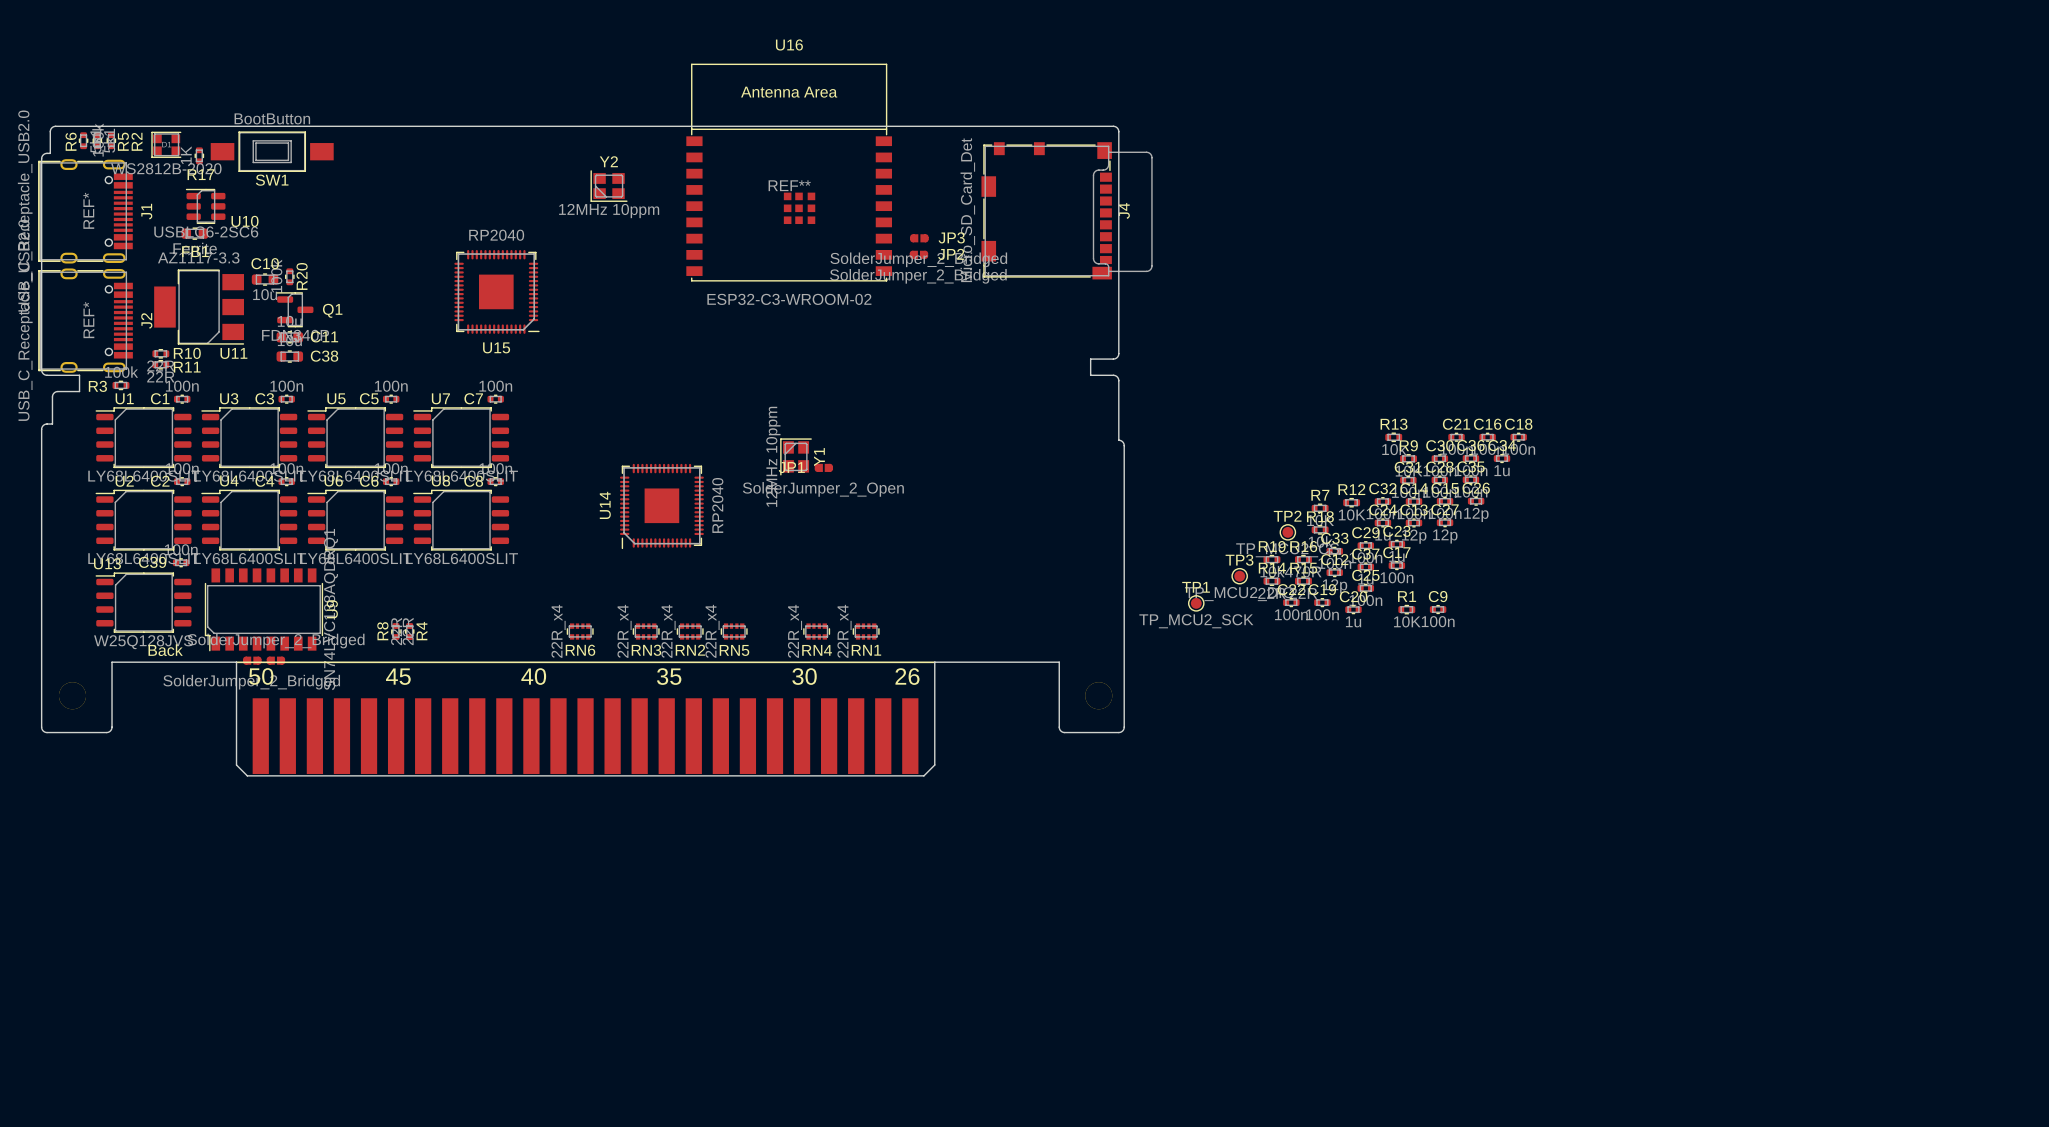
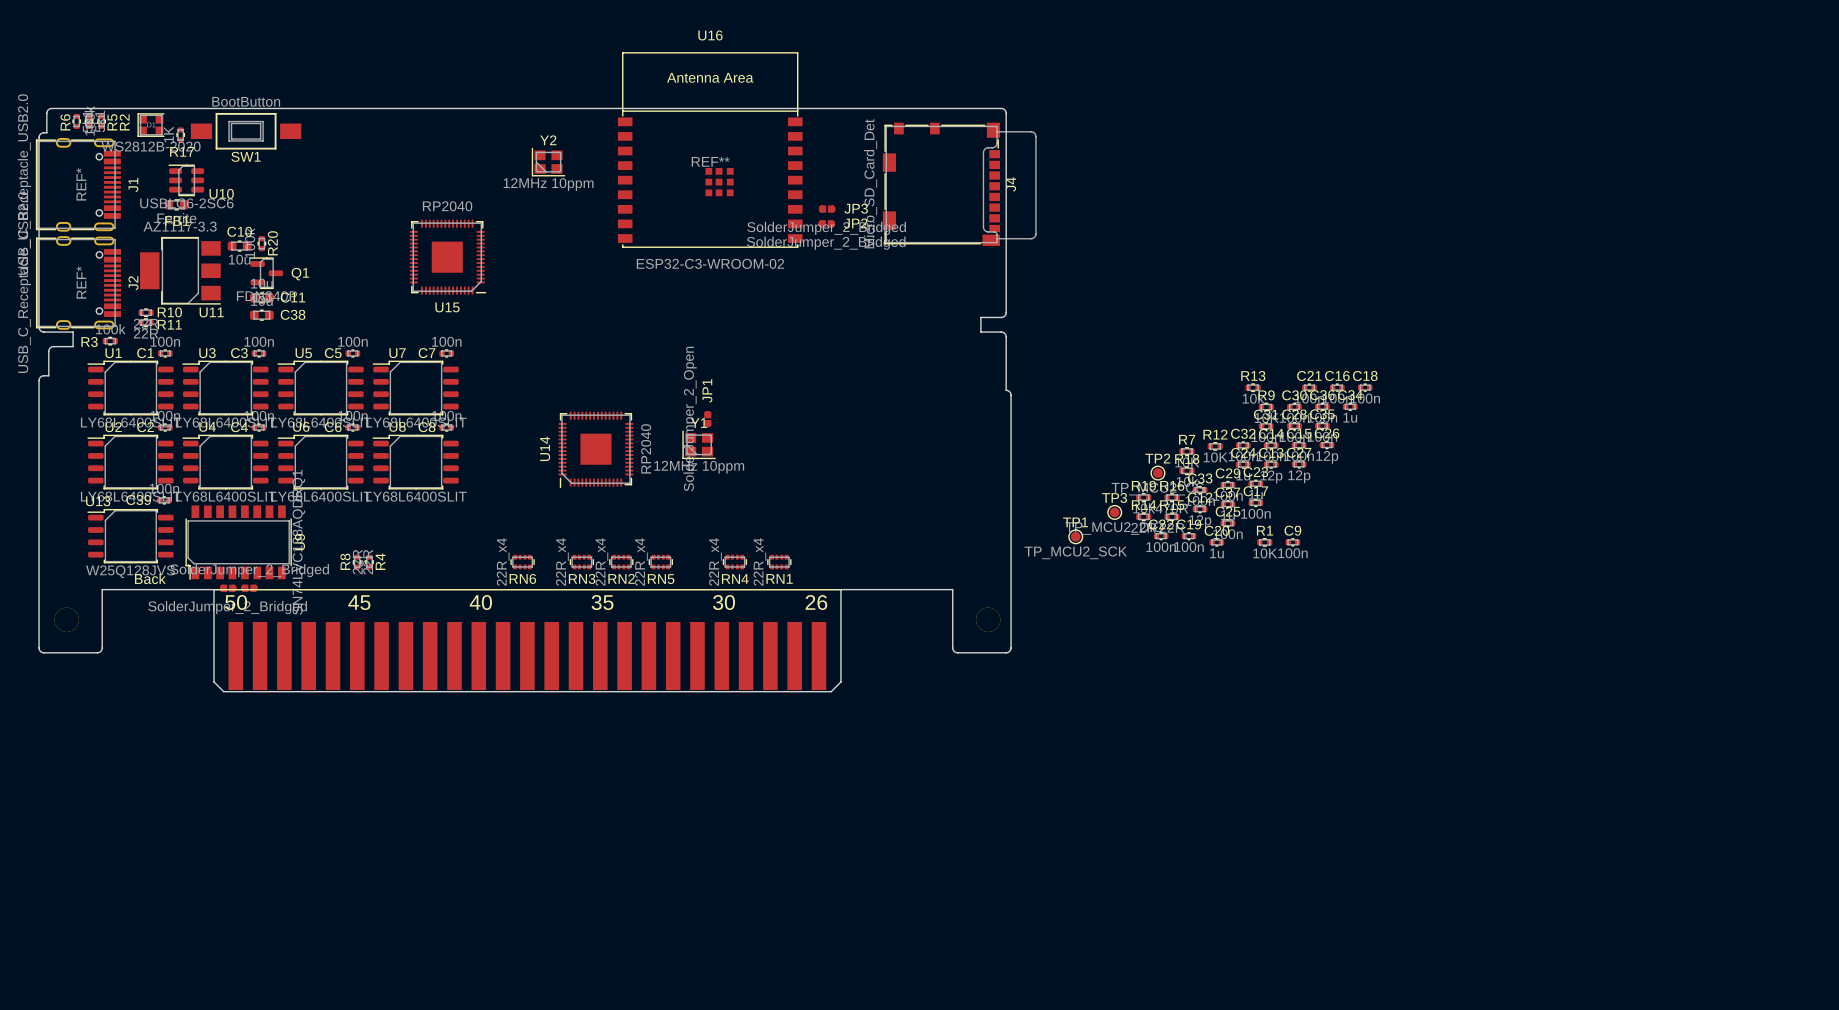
Y1 rotation: 0° (796, 456) -> 90° counterclockwise (699, 444)
Y1 position: (796, 456) -> (699, 444)
JP1 rotation: 0° (823, 467) -> 90° clockwise (707, 419)
JP1 position: (823, 467) -> (707, 419)

